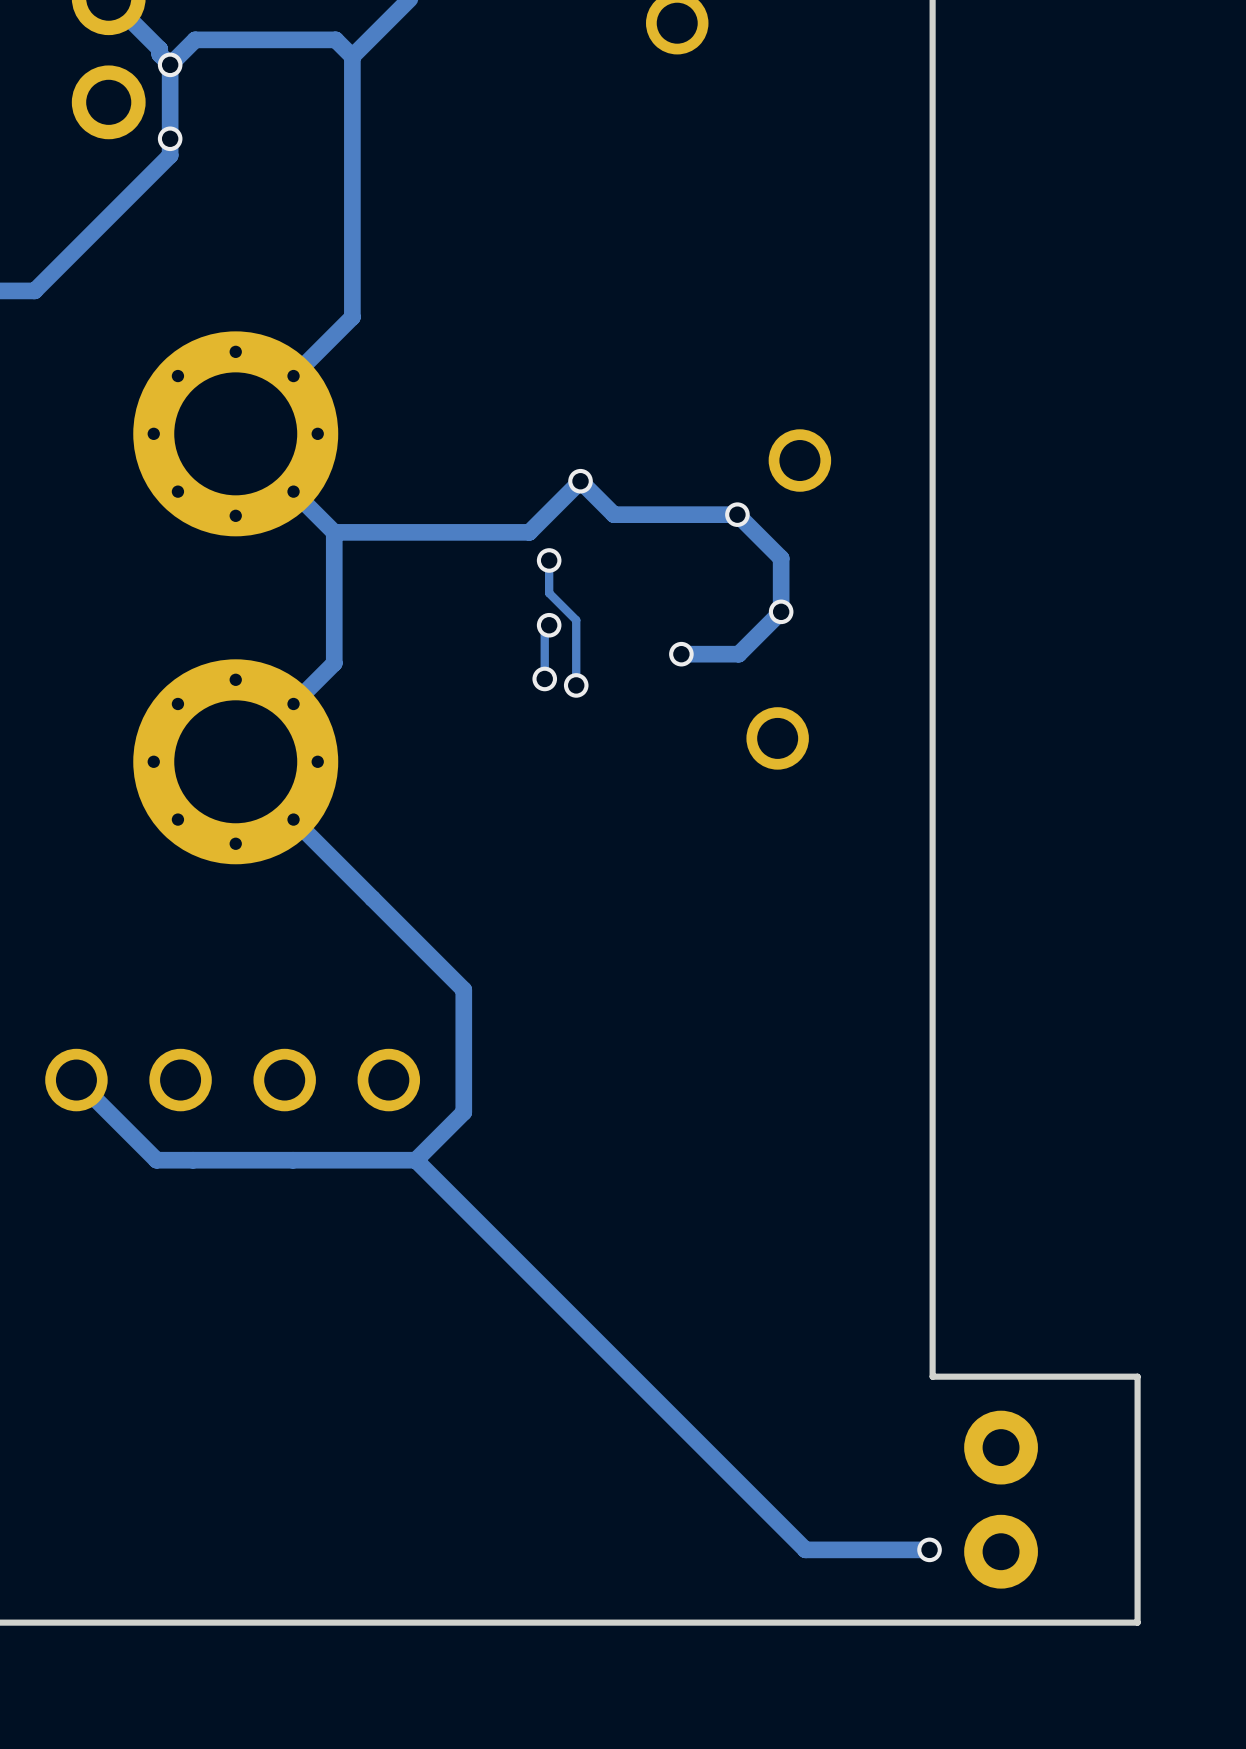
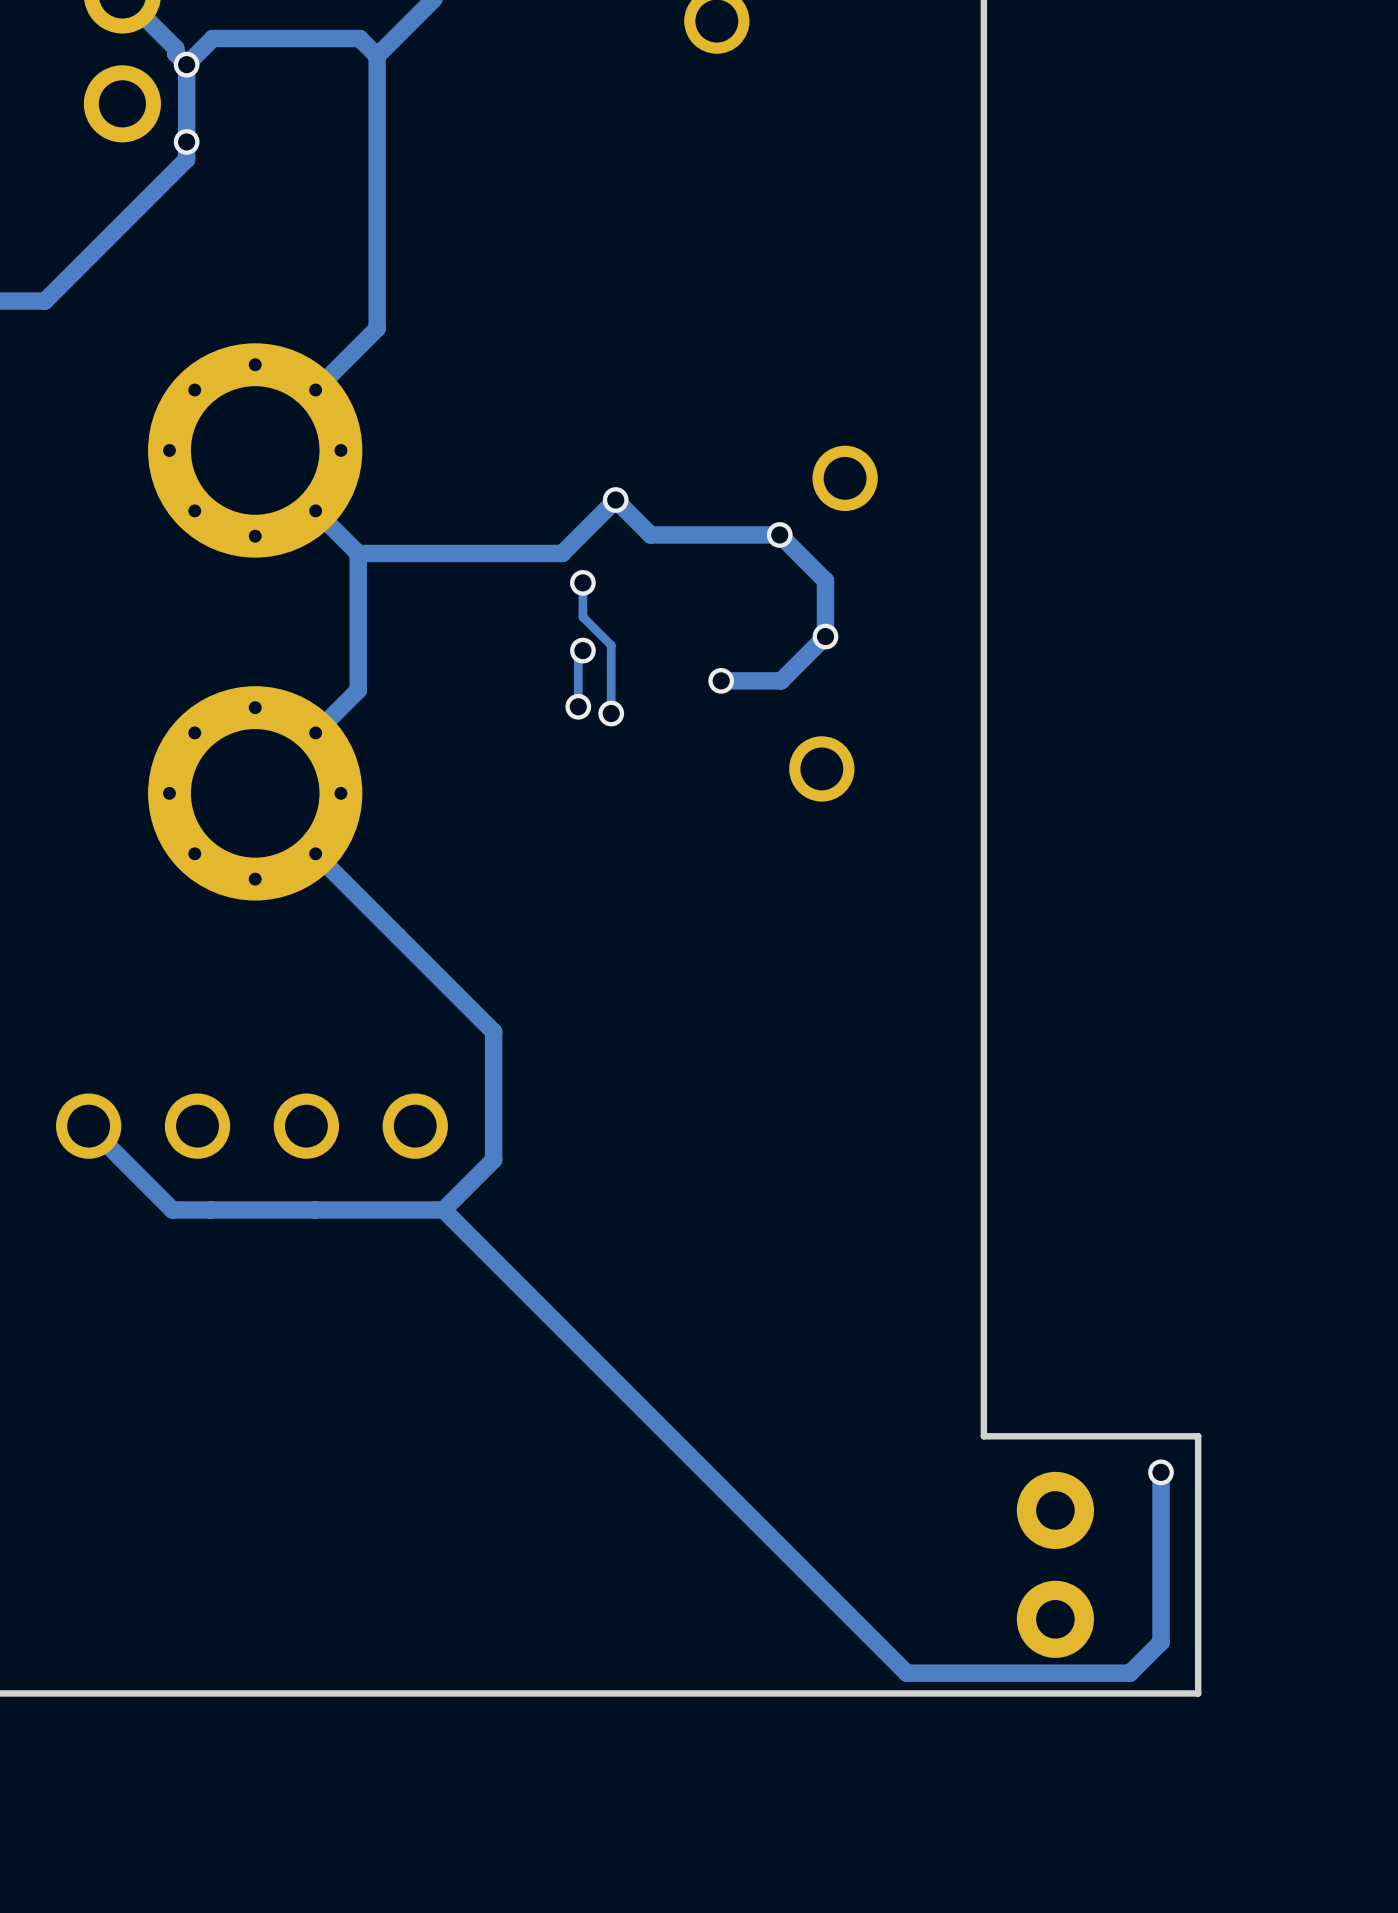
track: (929, 1549) (805, 1549) -> (1161, 1472) (1161, 1642) (1130, 1673) (906, 1673) (850, 1617)
via position: (929, 1549) -> (1161, 1472)

